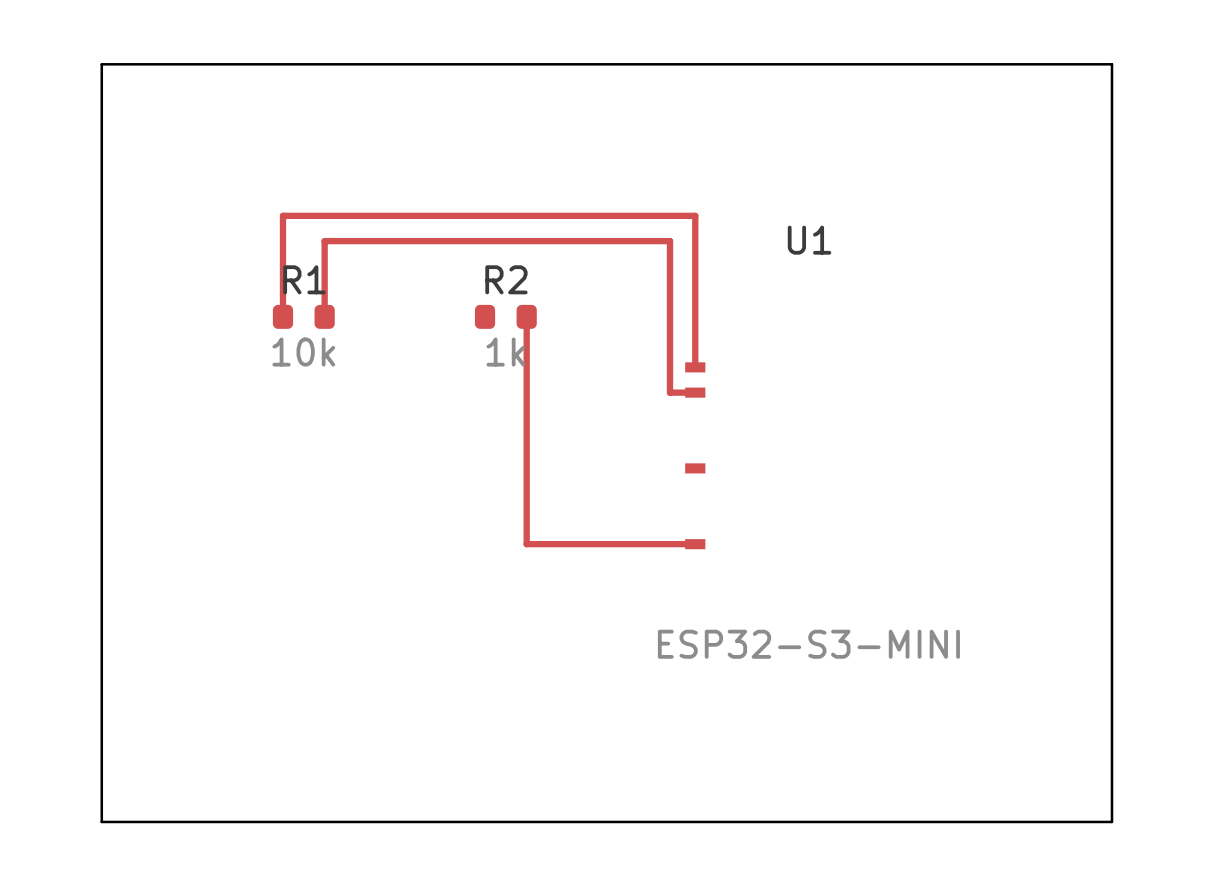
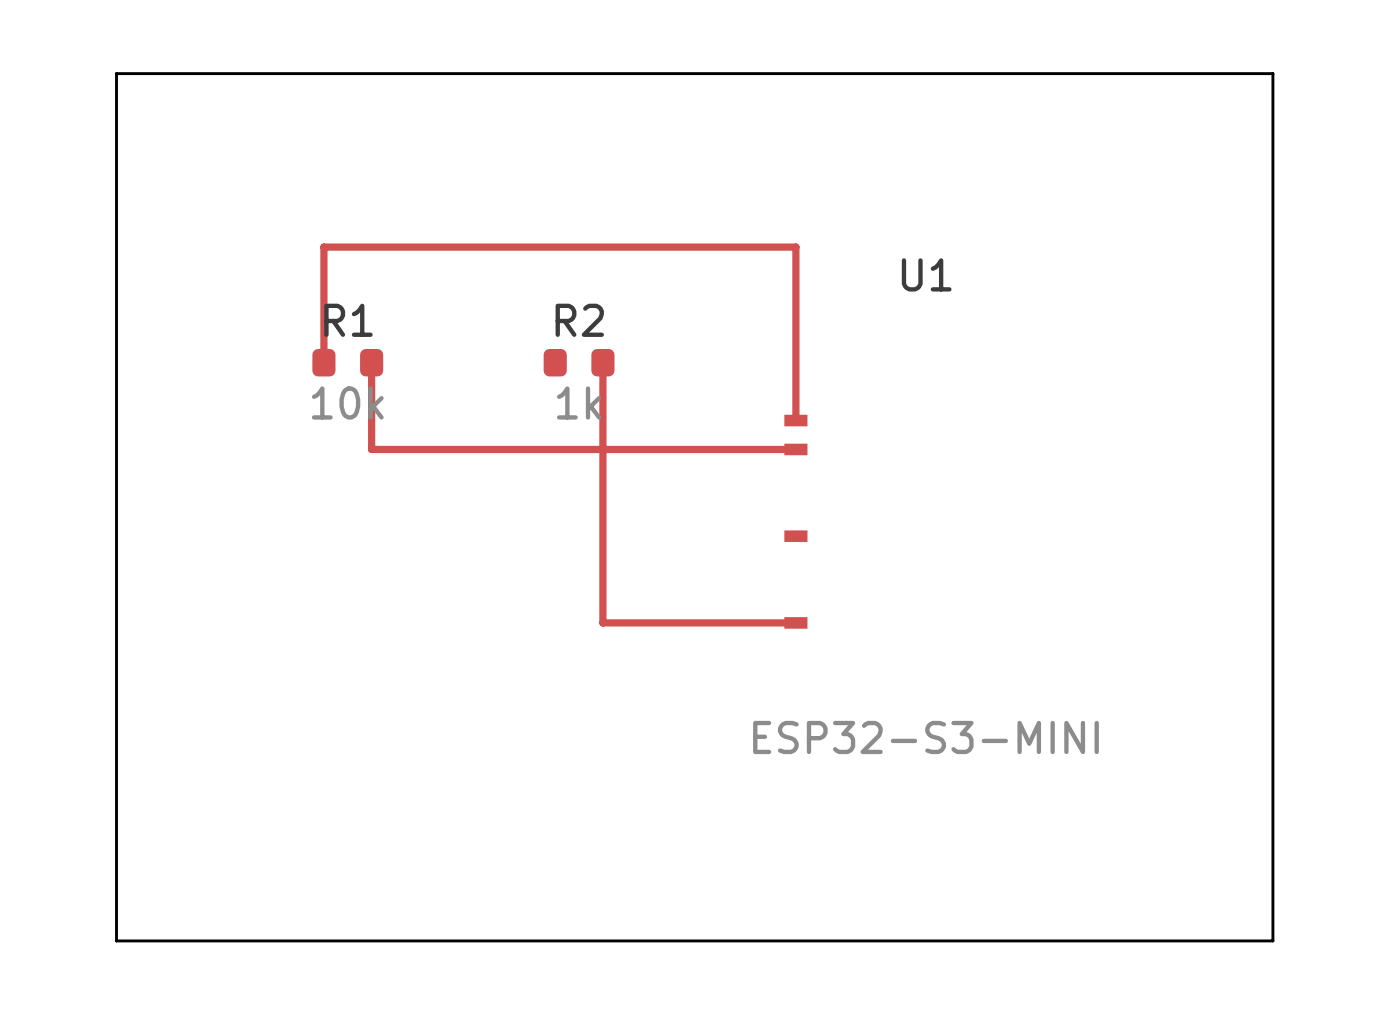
track: (324, 316) (324, 241) (670, 241) (670, 392) -> (371, 362) (371, 449) (766, 449)

